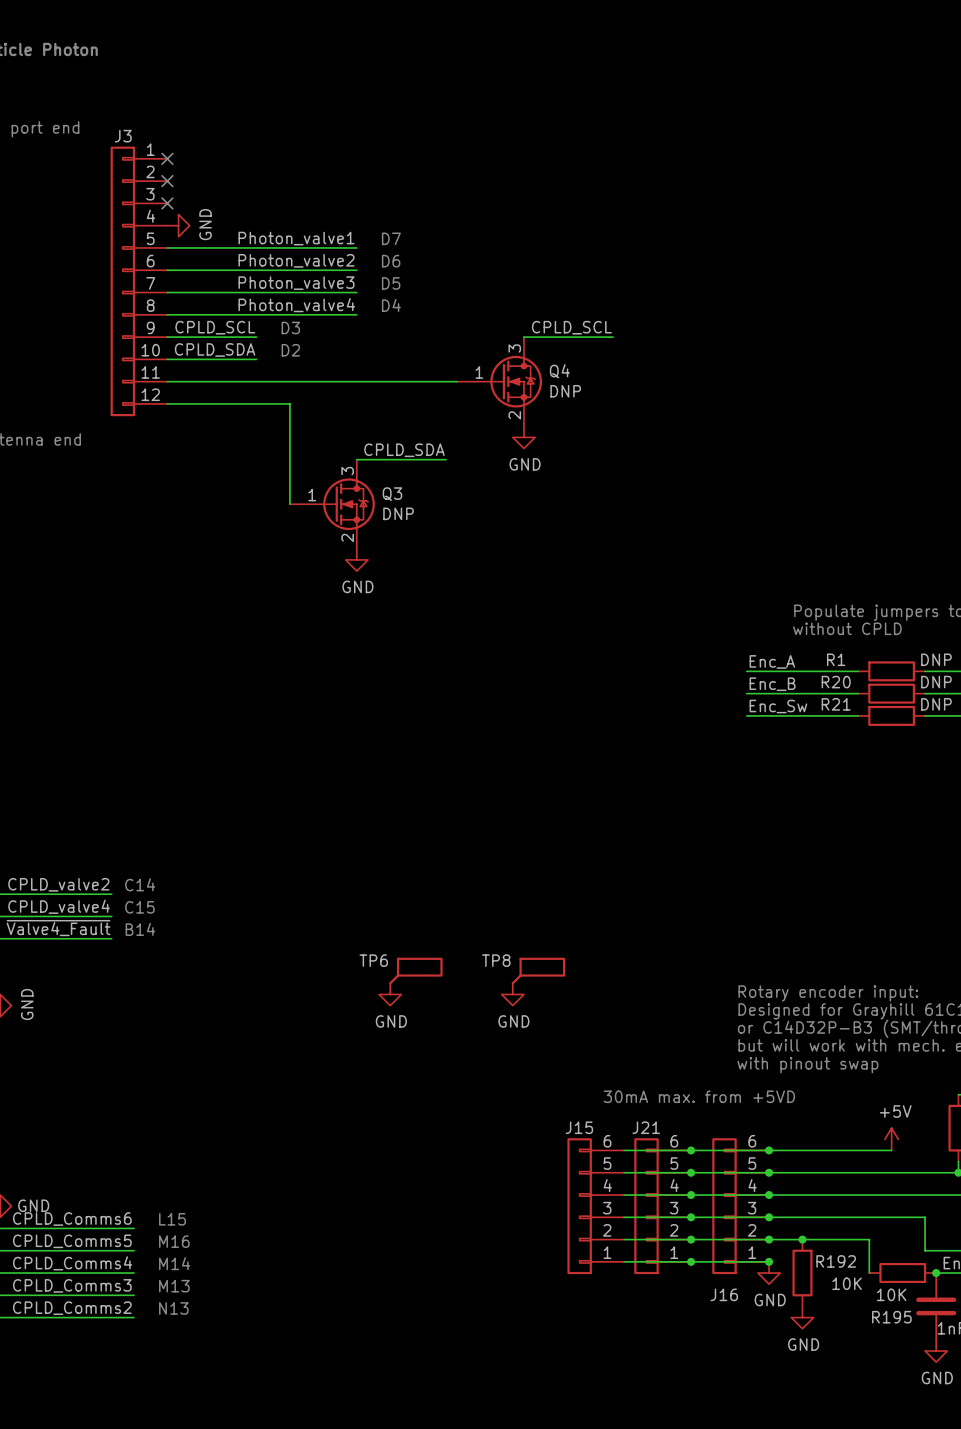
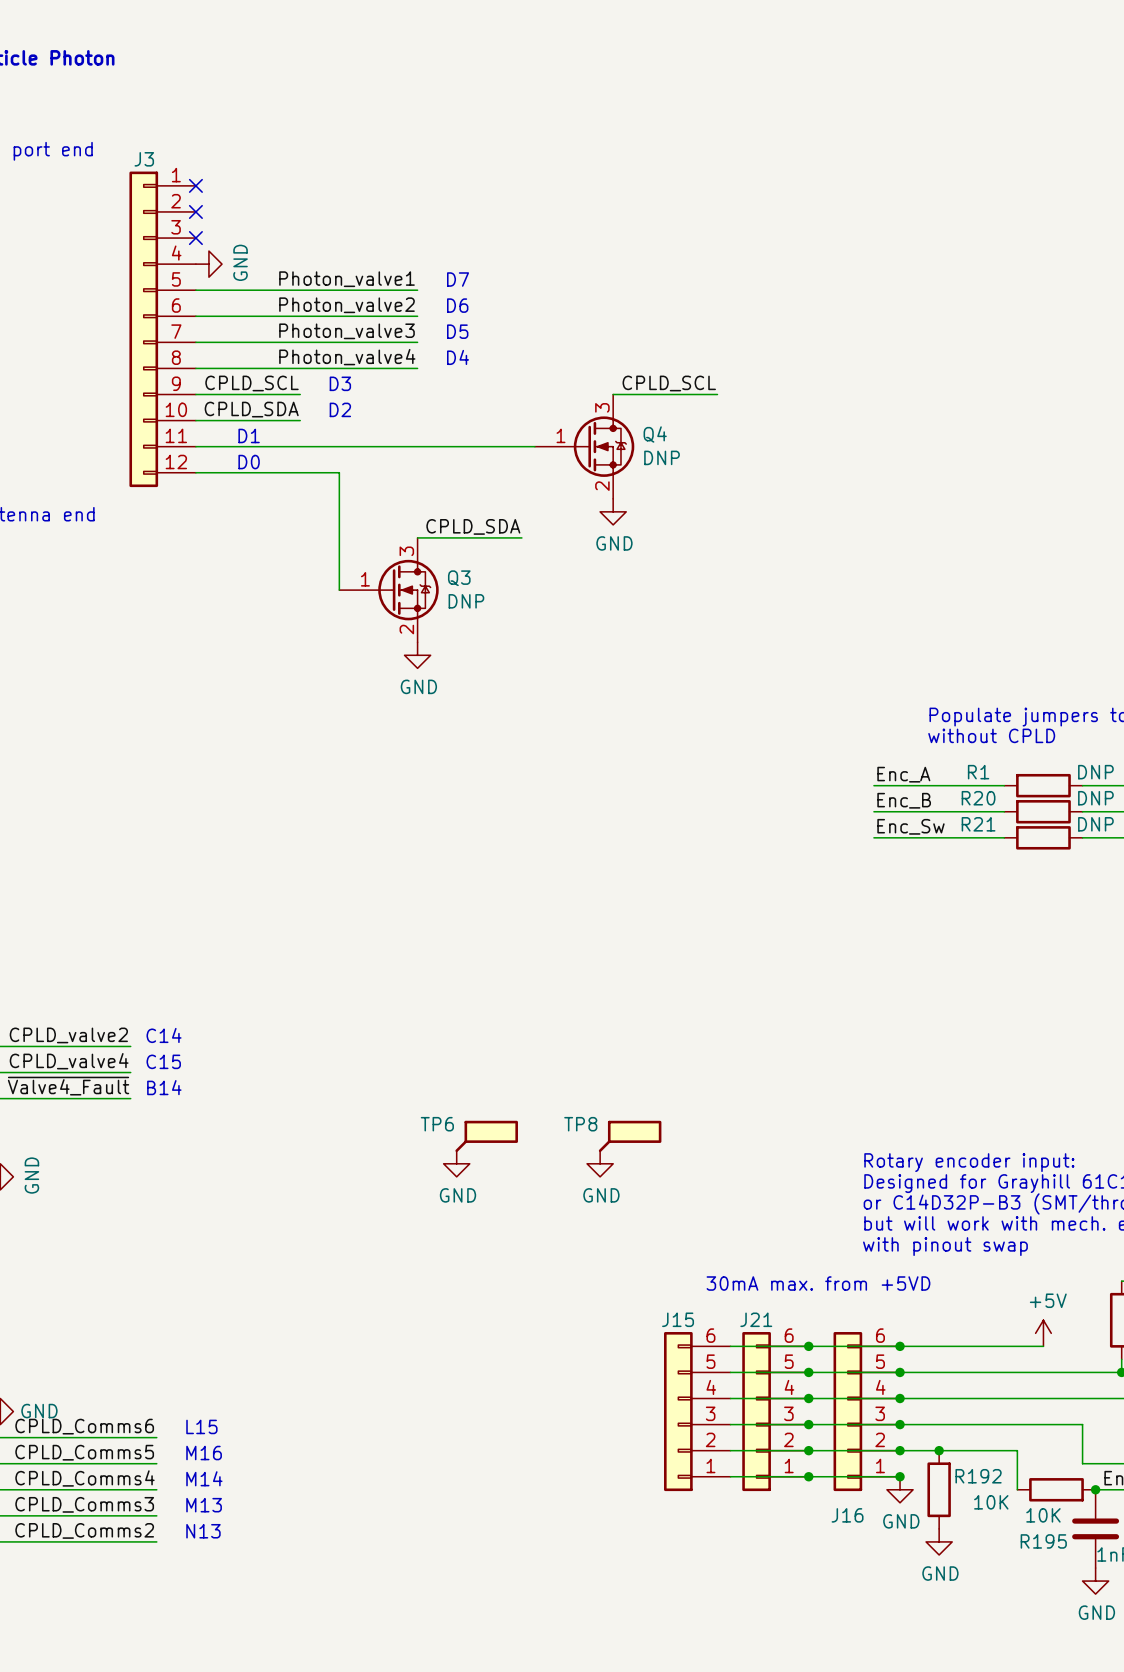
text: none -> D1 (249, 435)
text: none -> D0 (249, 462)

